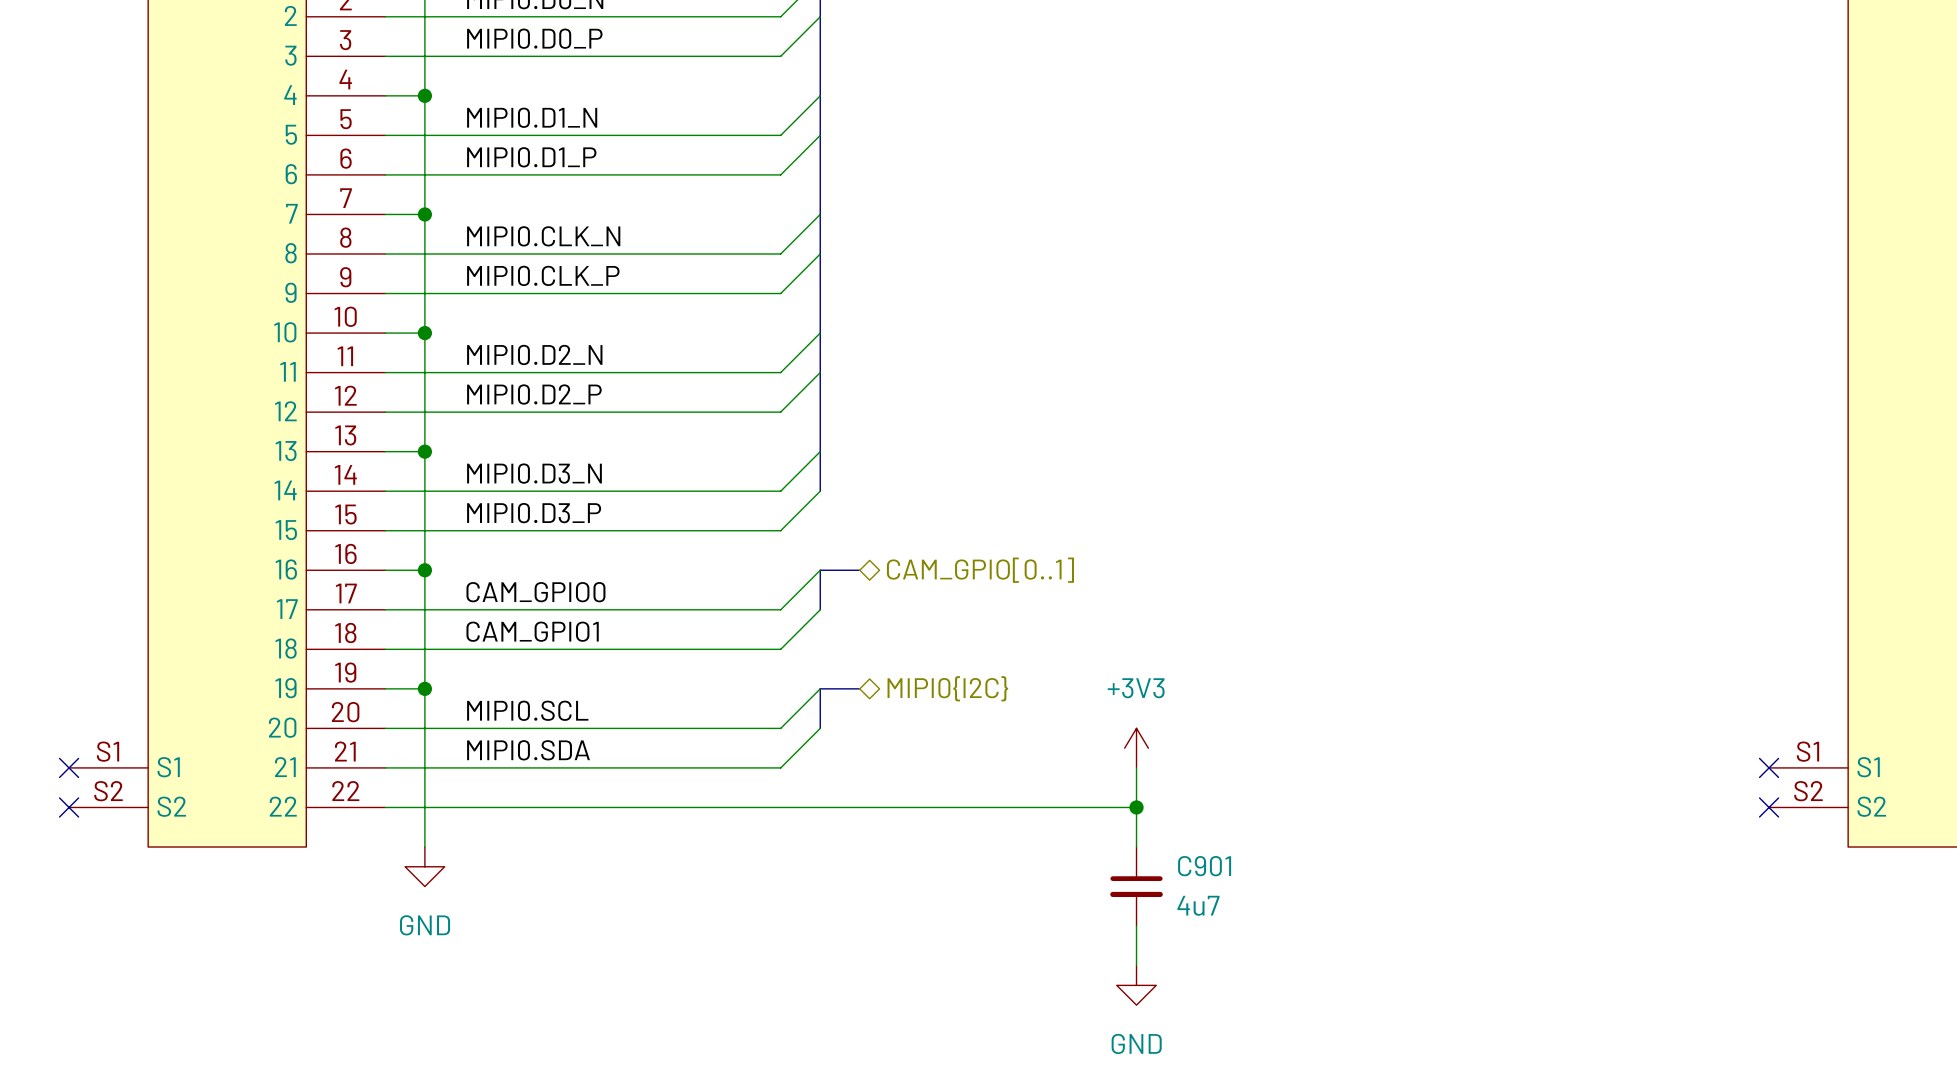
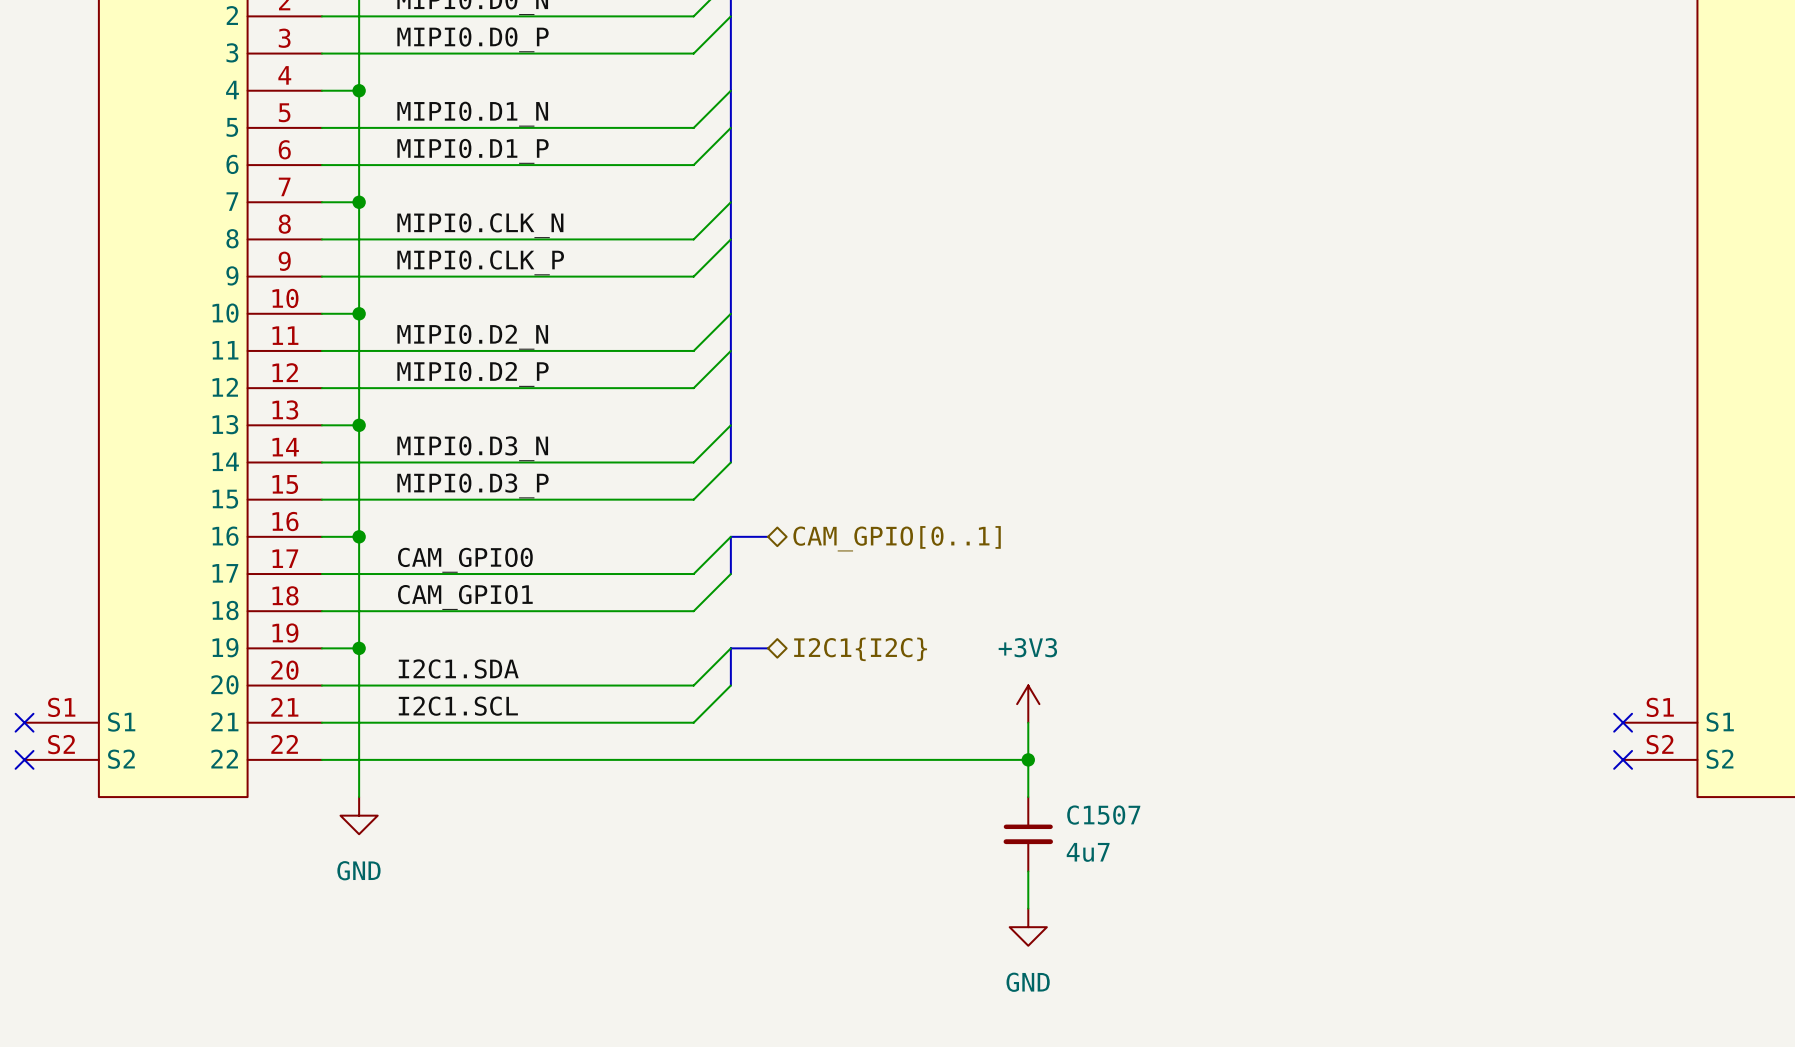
hierarchical label: MIPI0{I2C} (947, 688) -> I2C1{I2C} (860, 649)
label: MIPI0.SCL (527, 710) -> I2C1.SDA (458, 668)
label: MIPI0.SDA (528, 750) -> I2C1.SCL (458, 706)
C901 name: C901 (1204, 866) -> C1507 (1103, 815)

